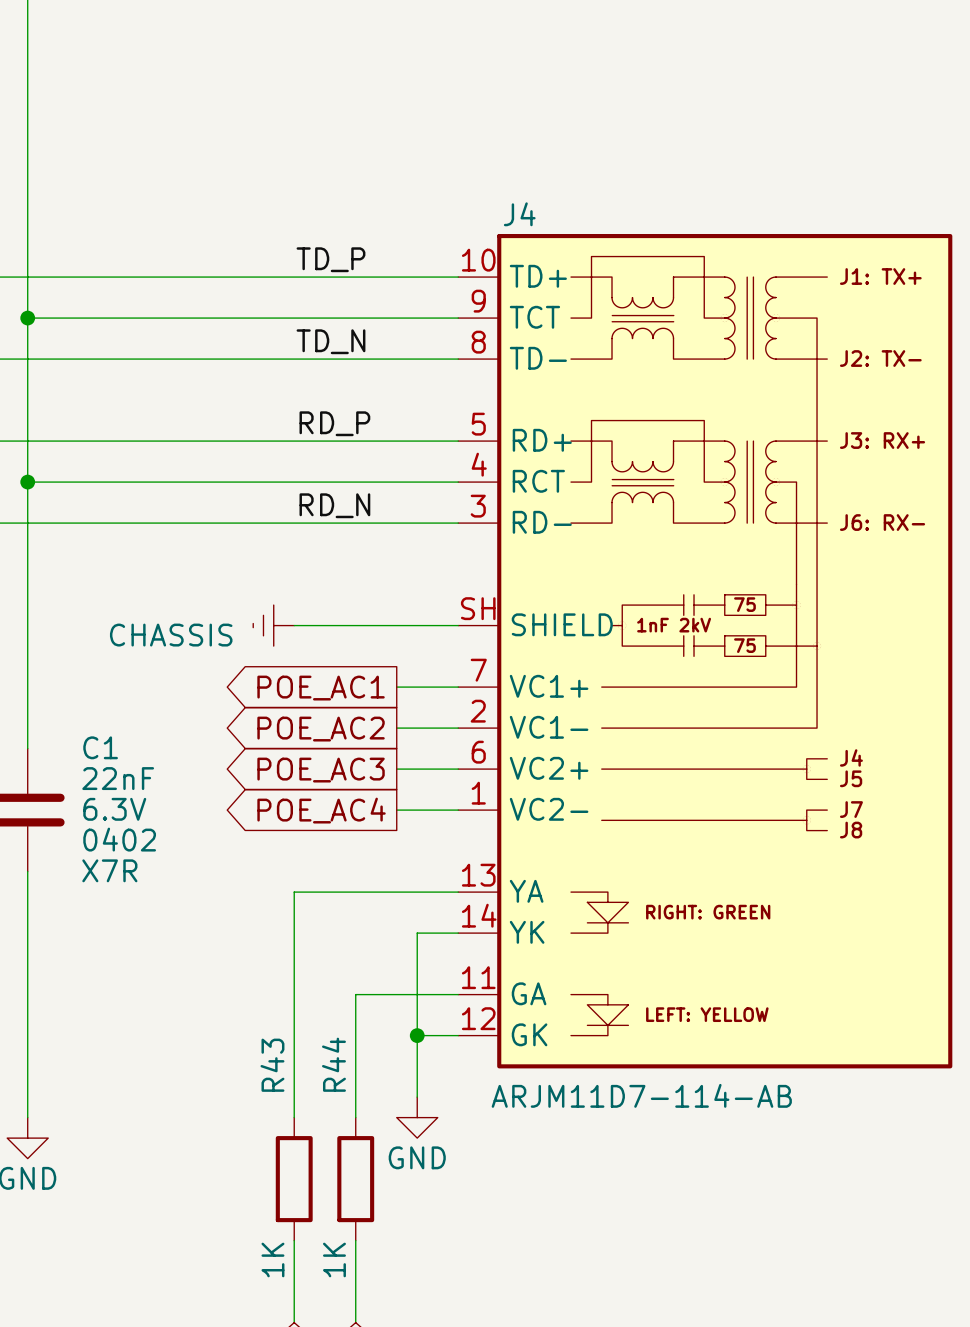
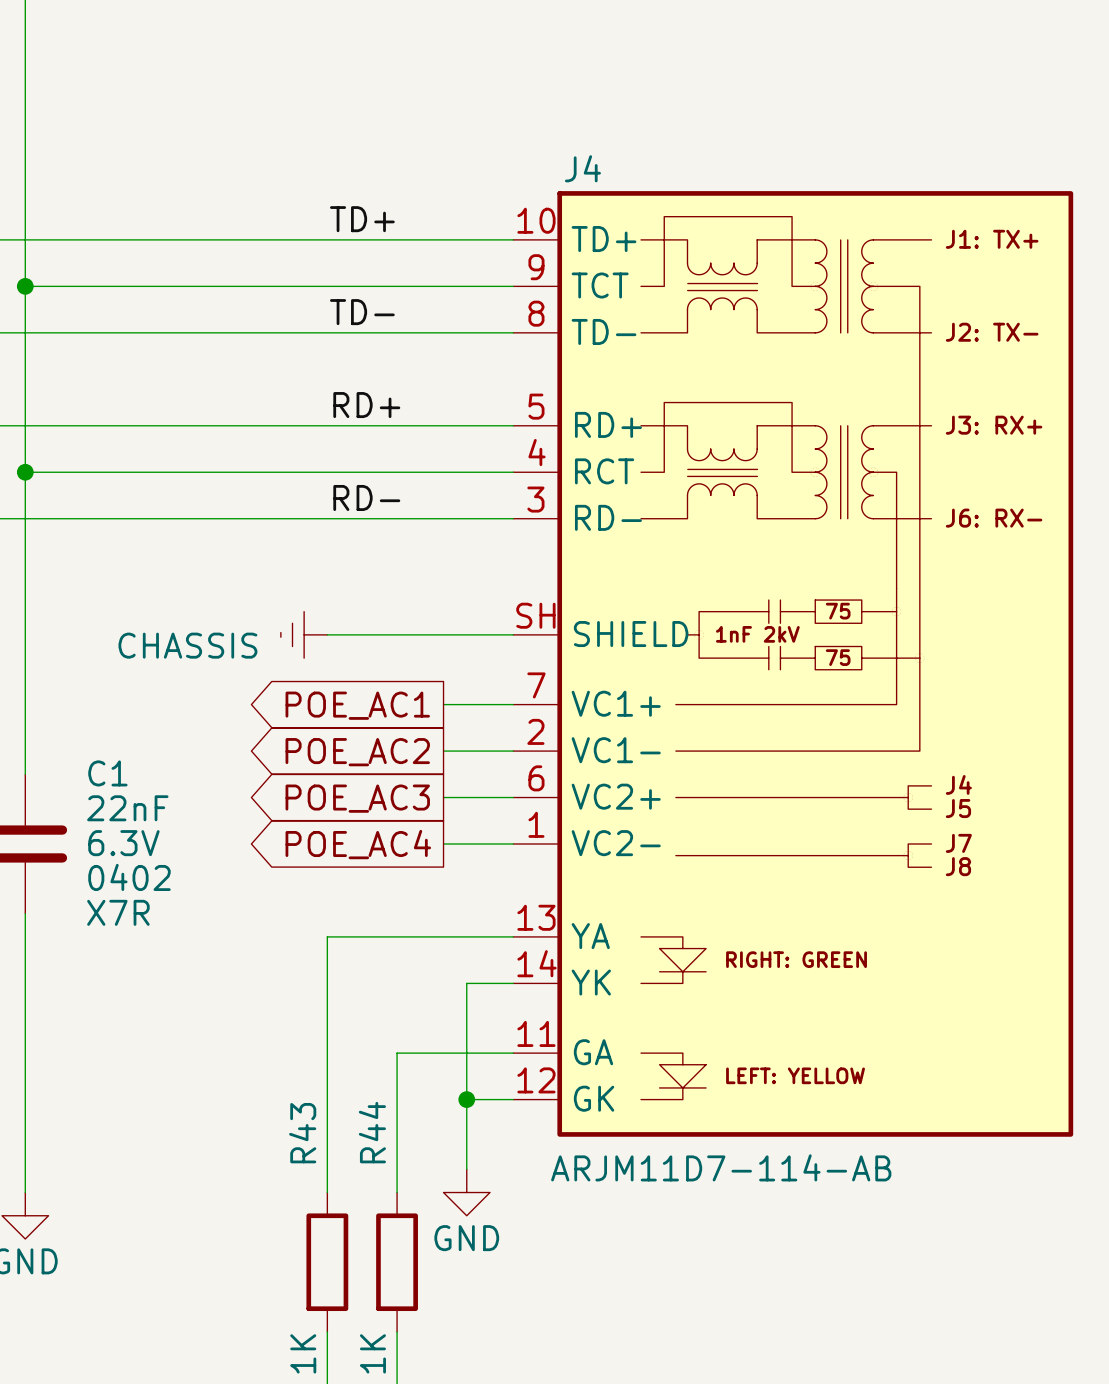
label: TD_P (330, 259) -> TD+ (362, 219)
label: TD_N (330, 341) -> TD- (362, 312)
label: RD_P (334, 423) -> RD+ (366, 405)
label: RD_N (334, 505) -> RD- (366, 497)

